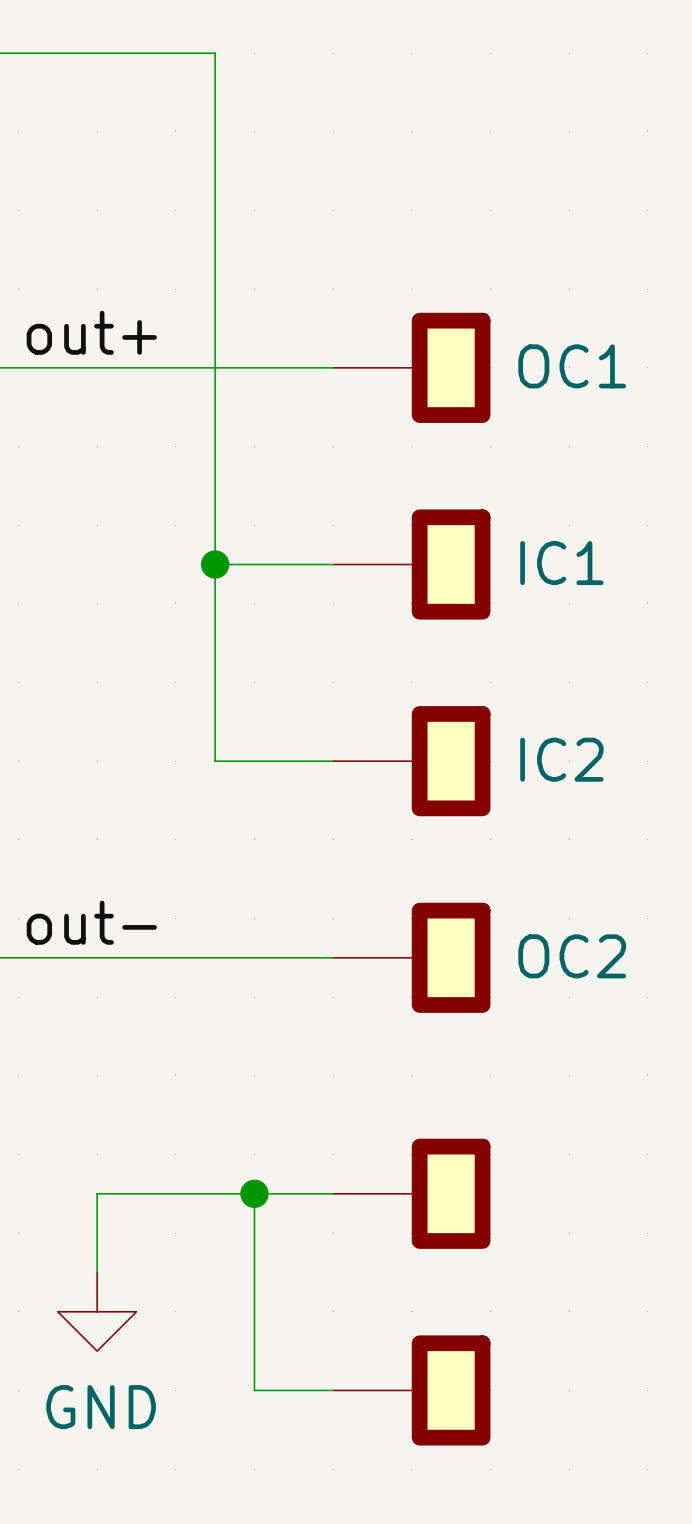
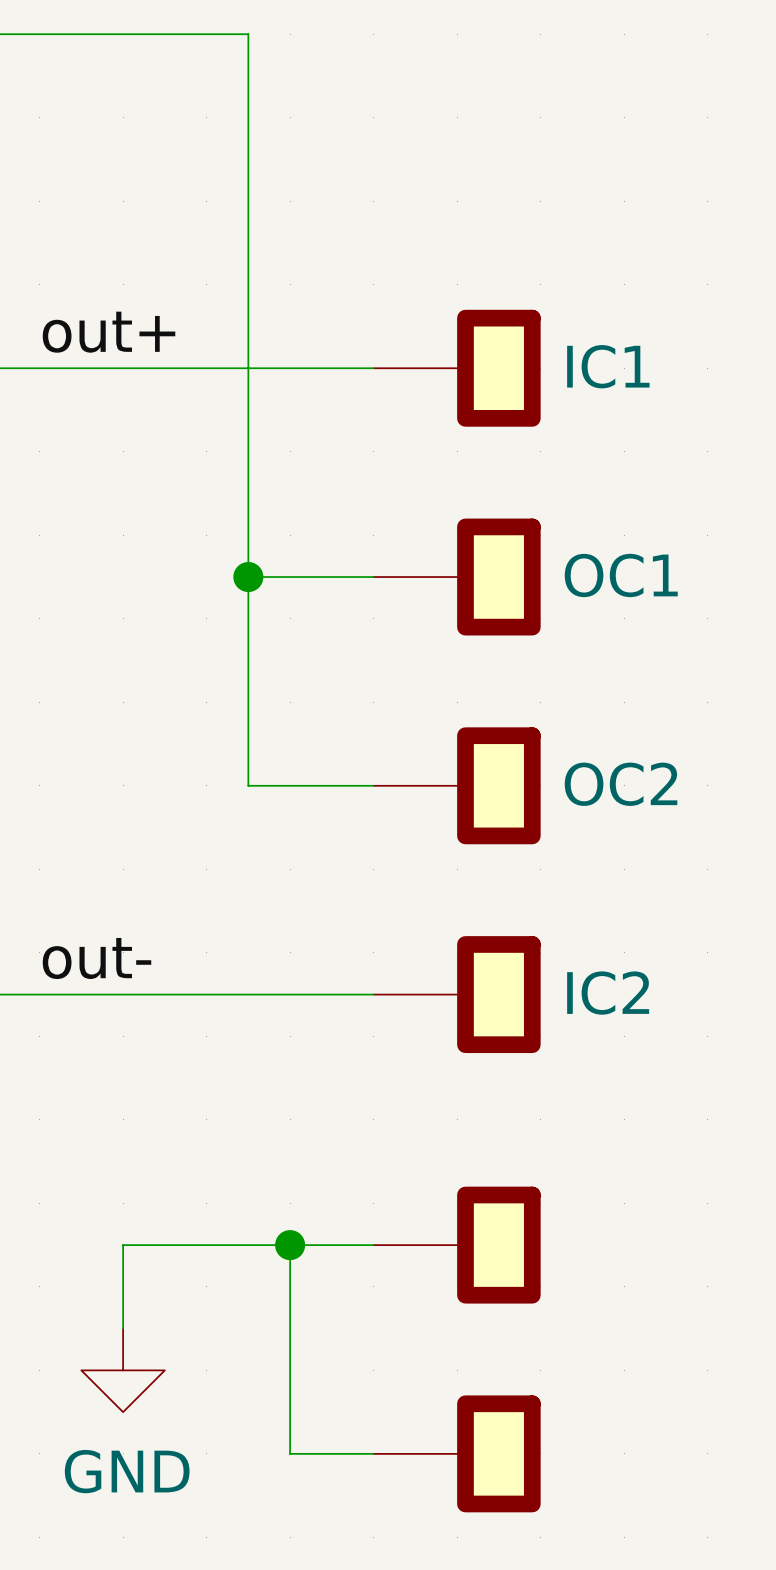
OC1 name: OC1 (572, 366) -> IC1 (608, 366)
IC1 name: IC1 (561, 563) -> OC1 (621, 575)
IC2 name: IC2 (561, 759) -> OC2 (621, 784)
OC2 name: OC2 (572, 956) -> IC2 (608, 993)

